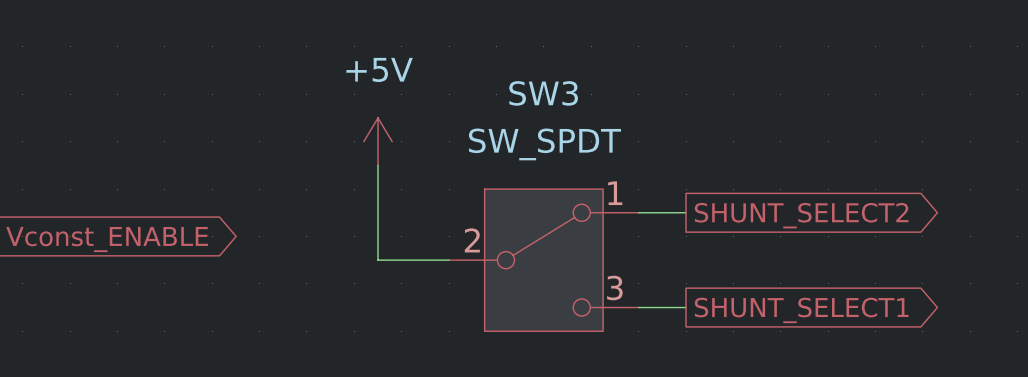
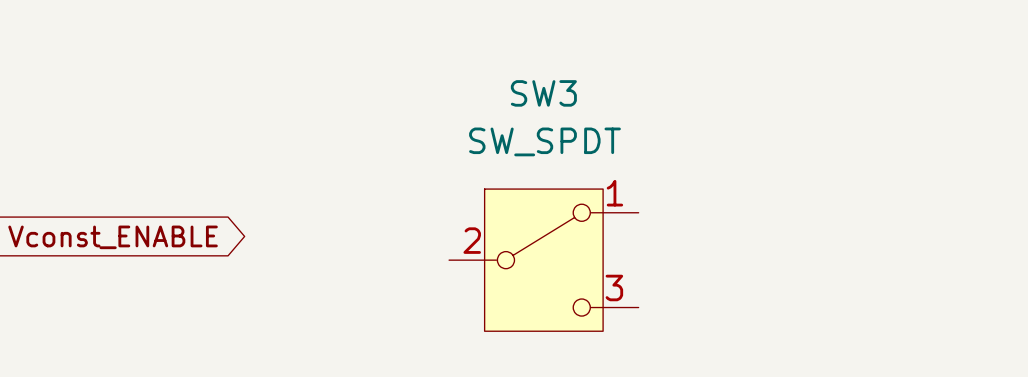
power symbol: +5V (378, 141) -> none
wire: (378, 165) (378, 260) (449, 260) -> none
wire: (638, 212) (686, 212) -> none
global label: SHUNT_SELECT2 (801, 215) -> none
wire: (638, 307) (686, 307) -> none
global label: SHUNT_SELECT1 (801, 310) -> none

